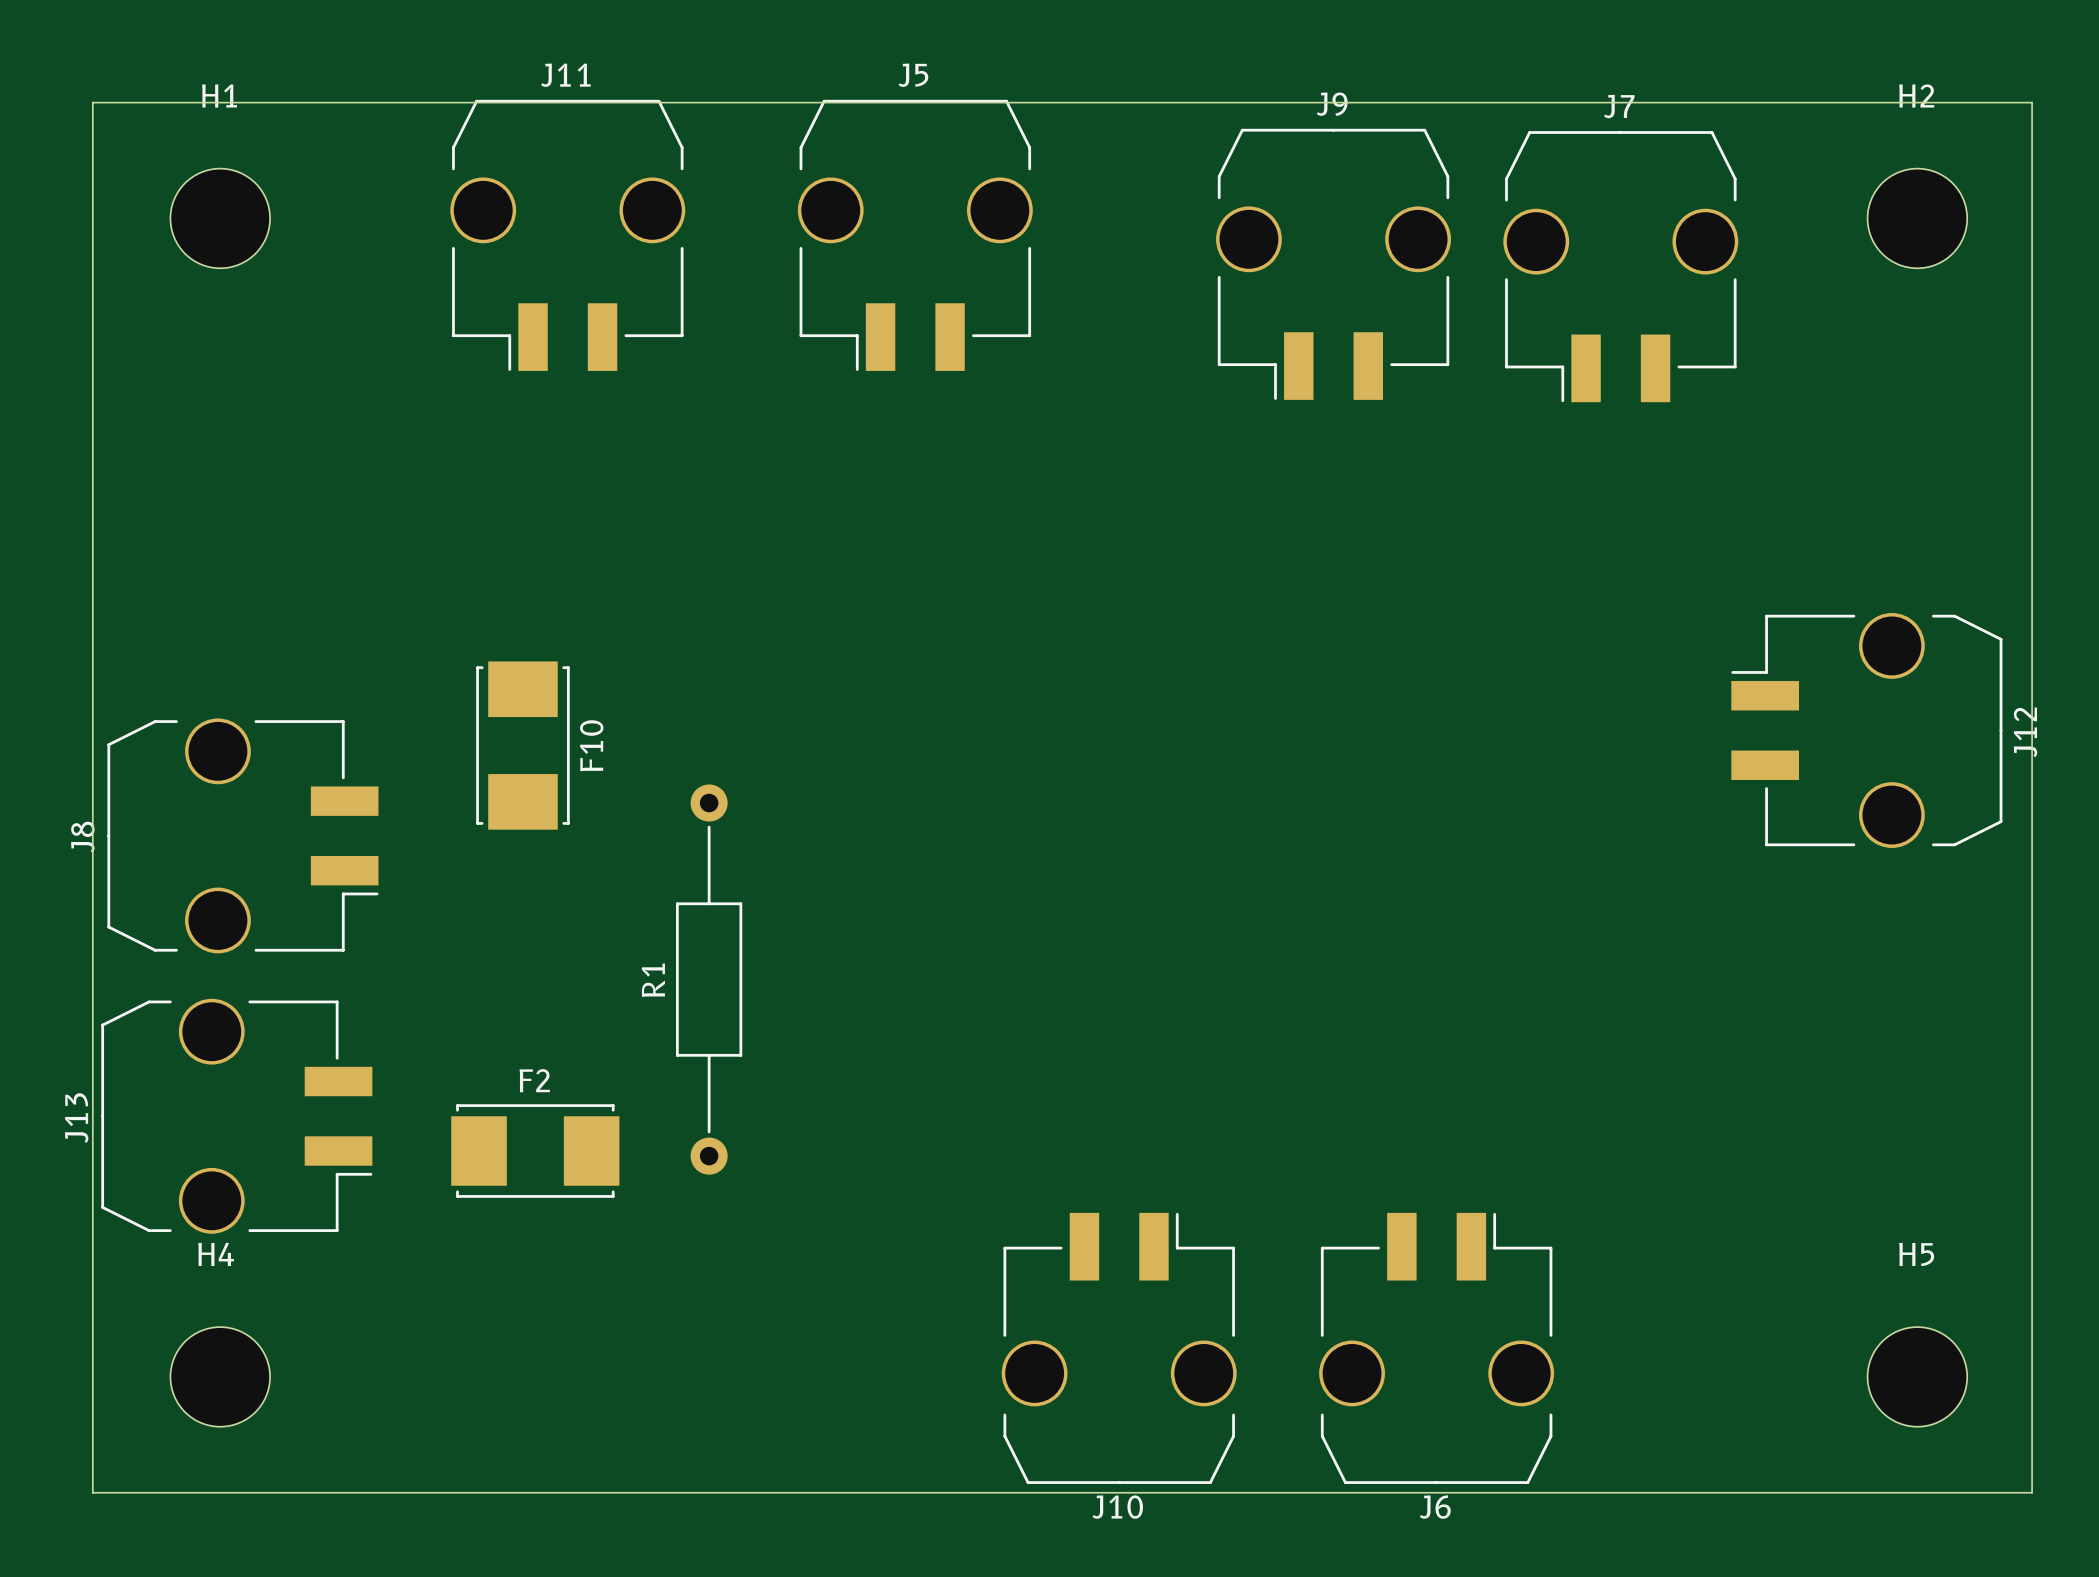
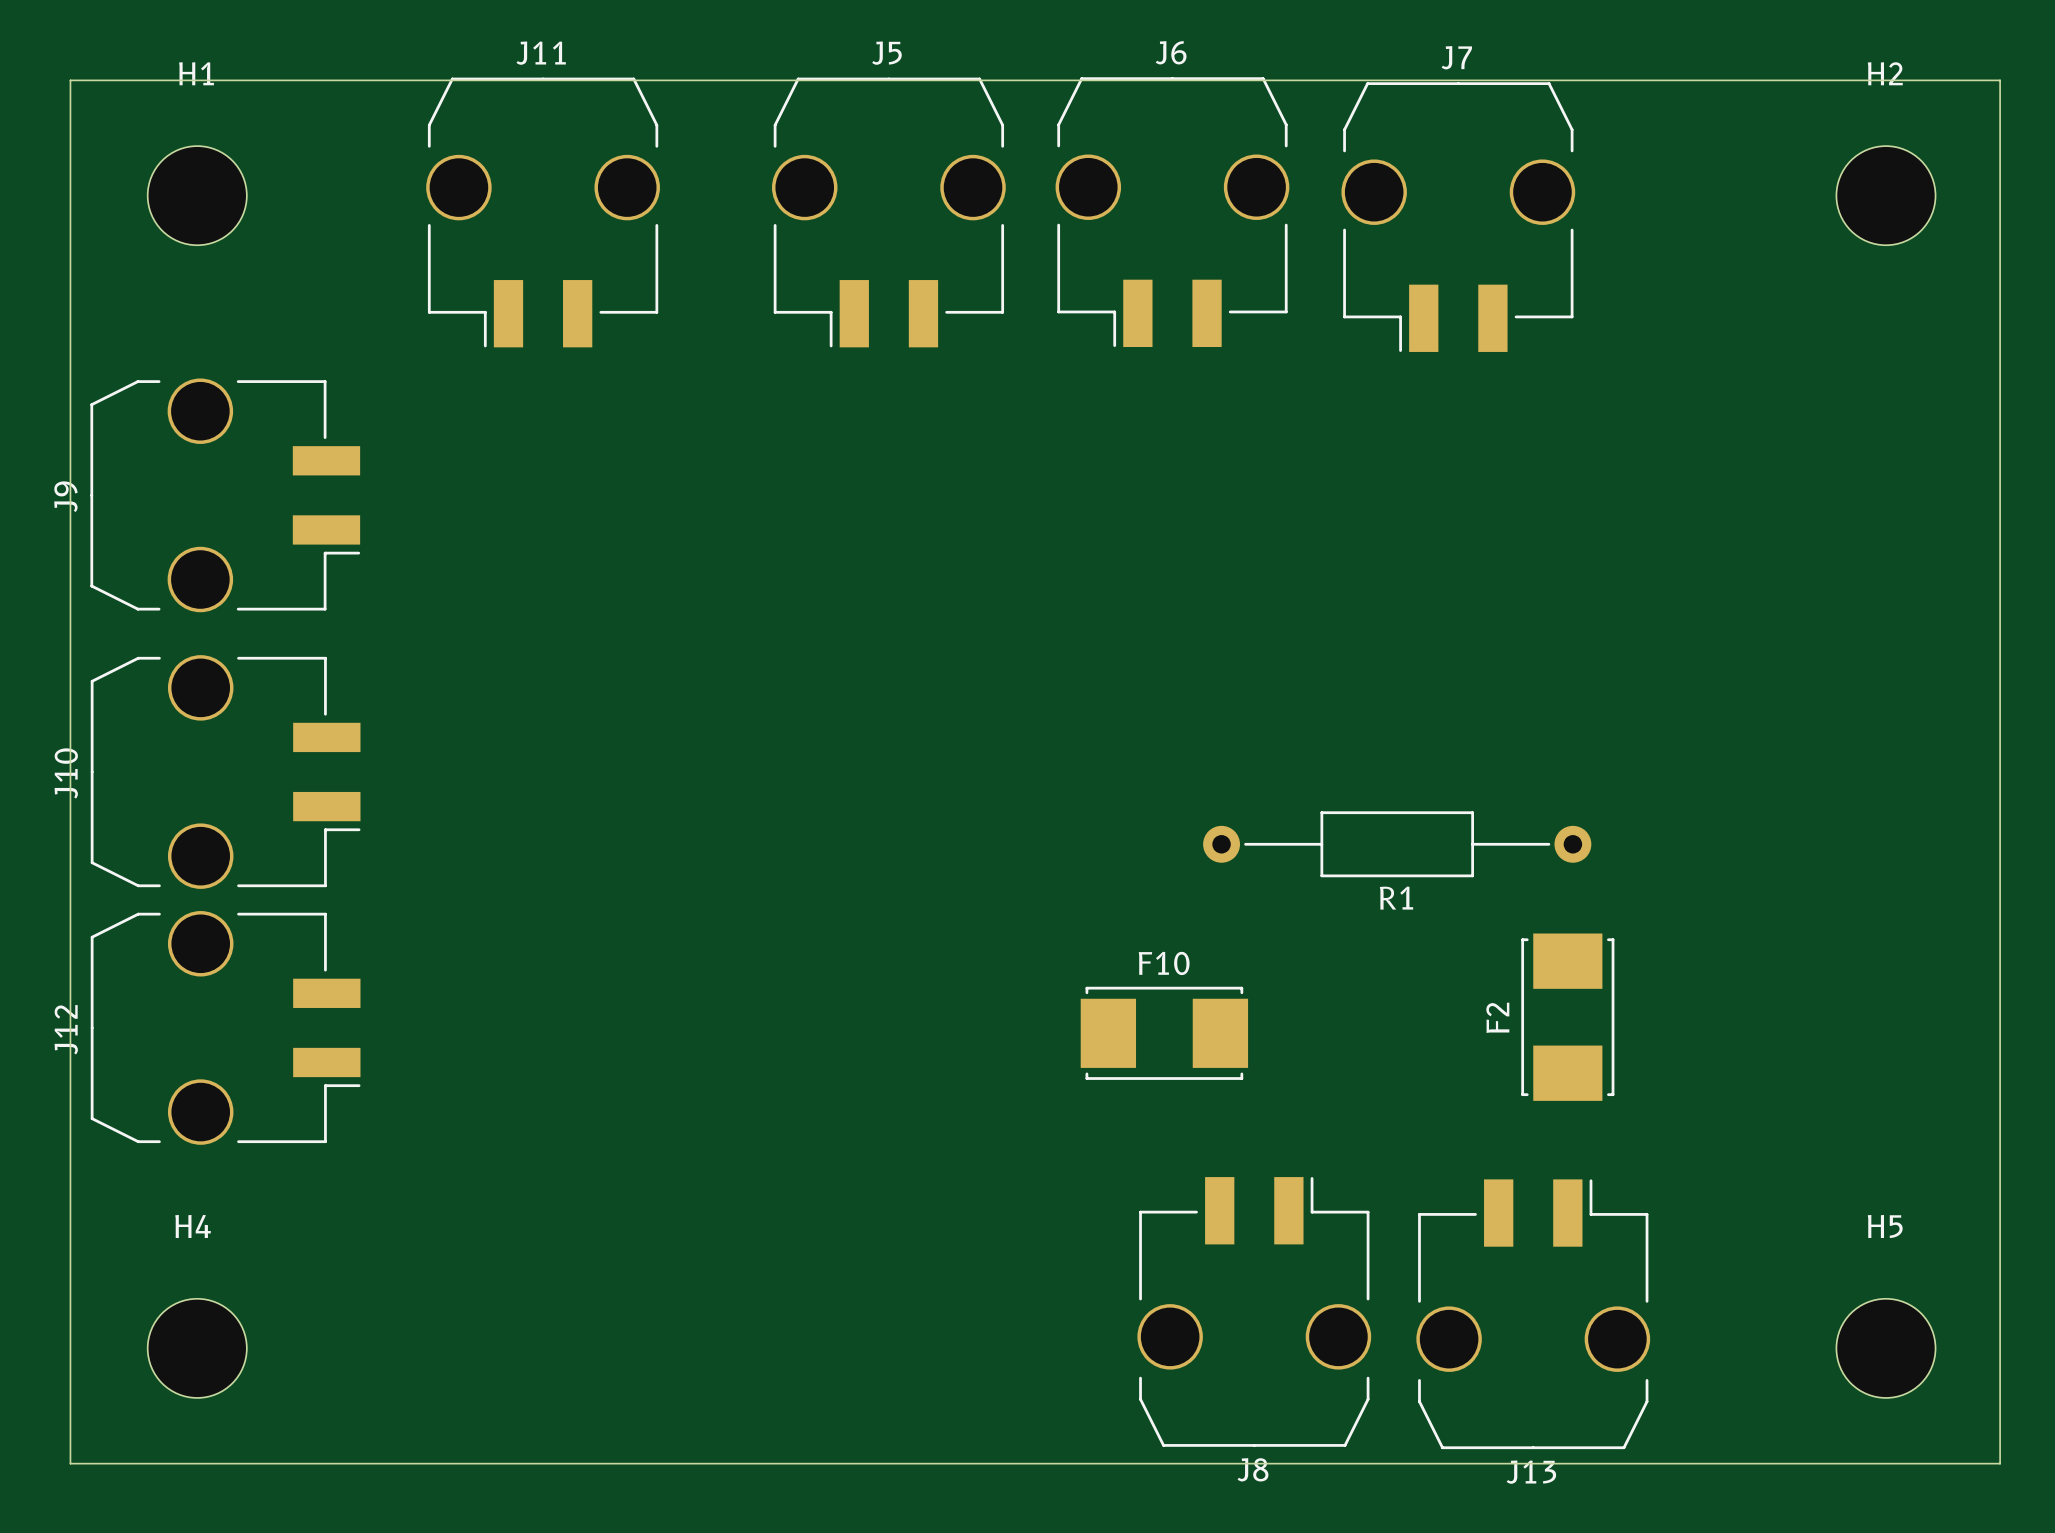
J9 rotation: 0° (1333, 264) -> 90° counterclockwise (225, 495)
J9 position: (1333, 264) -> (225, 495)
J7 position: (1620, 266) -> (1458, 217)
J12 rotation: 0° (1866, 730) -> 180° (225, 1027)
J12 position: (1866, 730) -> (225, 1027)
F10 rotation: 0° (522, 745) -> 90° clockwise (1164, 1033)
F10 position: (522, 745) -> (1164, 1033)
F10 name position: F10 (591, 745) -> F10 (1164, 963)
J8 rotation: 0° (242, 835) -> 90° counterclockwise (1254, 1311)
J8 position: (242, 835) -> (1254, 1311)
R1 rotation: 0° (709, 979) -> 90° clockwise (1397, 844)
R1 position: (709, 979) -> (1397, 844)
R1 name position: R1 (653, 980) -> R1 (1396, 898)
F2 name position: F2 (534, 1080) -> F2 (1497, 1017)
J13 rotation: 0° (236, 1116) -> 90° counterclockwise (1533, 1314)
J13 position: (236, 1116) -> (1533, 1314)
F2 rotation: 0° (535, 1151) -> 90° clockwise (1567, 1017)
F2 position: (535, 1151) -> (1567, 1017)
J10 rotation: 0° (1119, 1348) -> 90° clockwise (225, 772)
J10 position: (1119, 1348) -> (225, 772)
J6 rotation: 0° (1436, 1348) -> 180° (1172, 212)
J6 position: (1436, 1348) -> (1172, 212)

